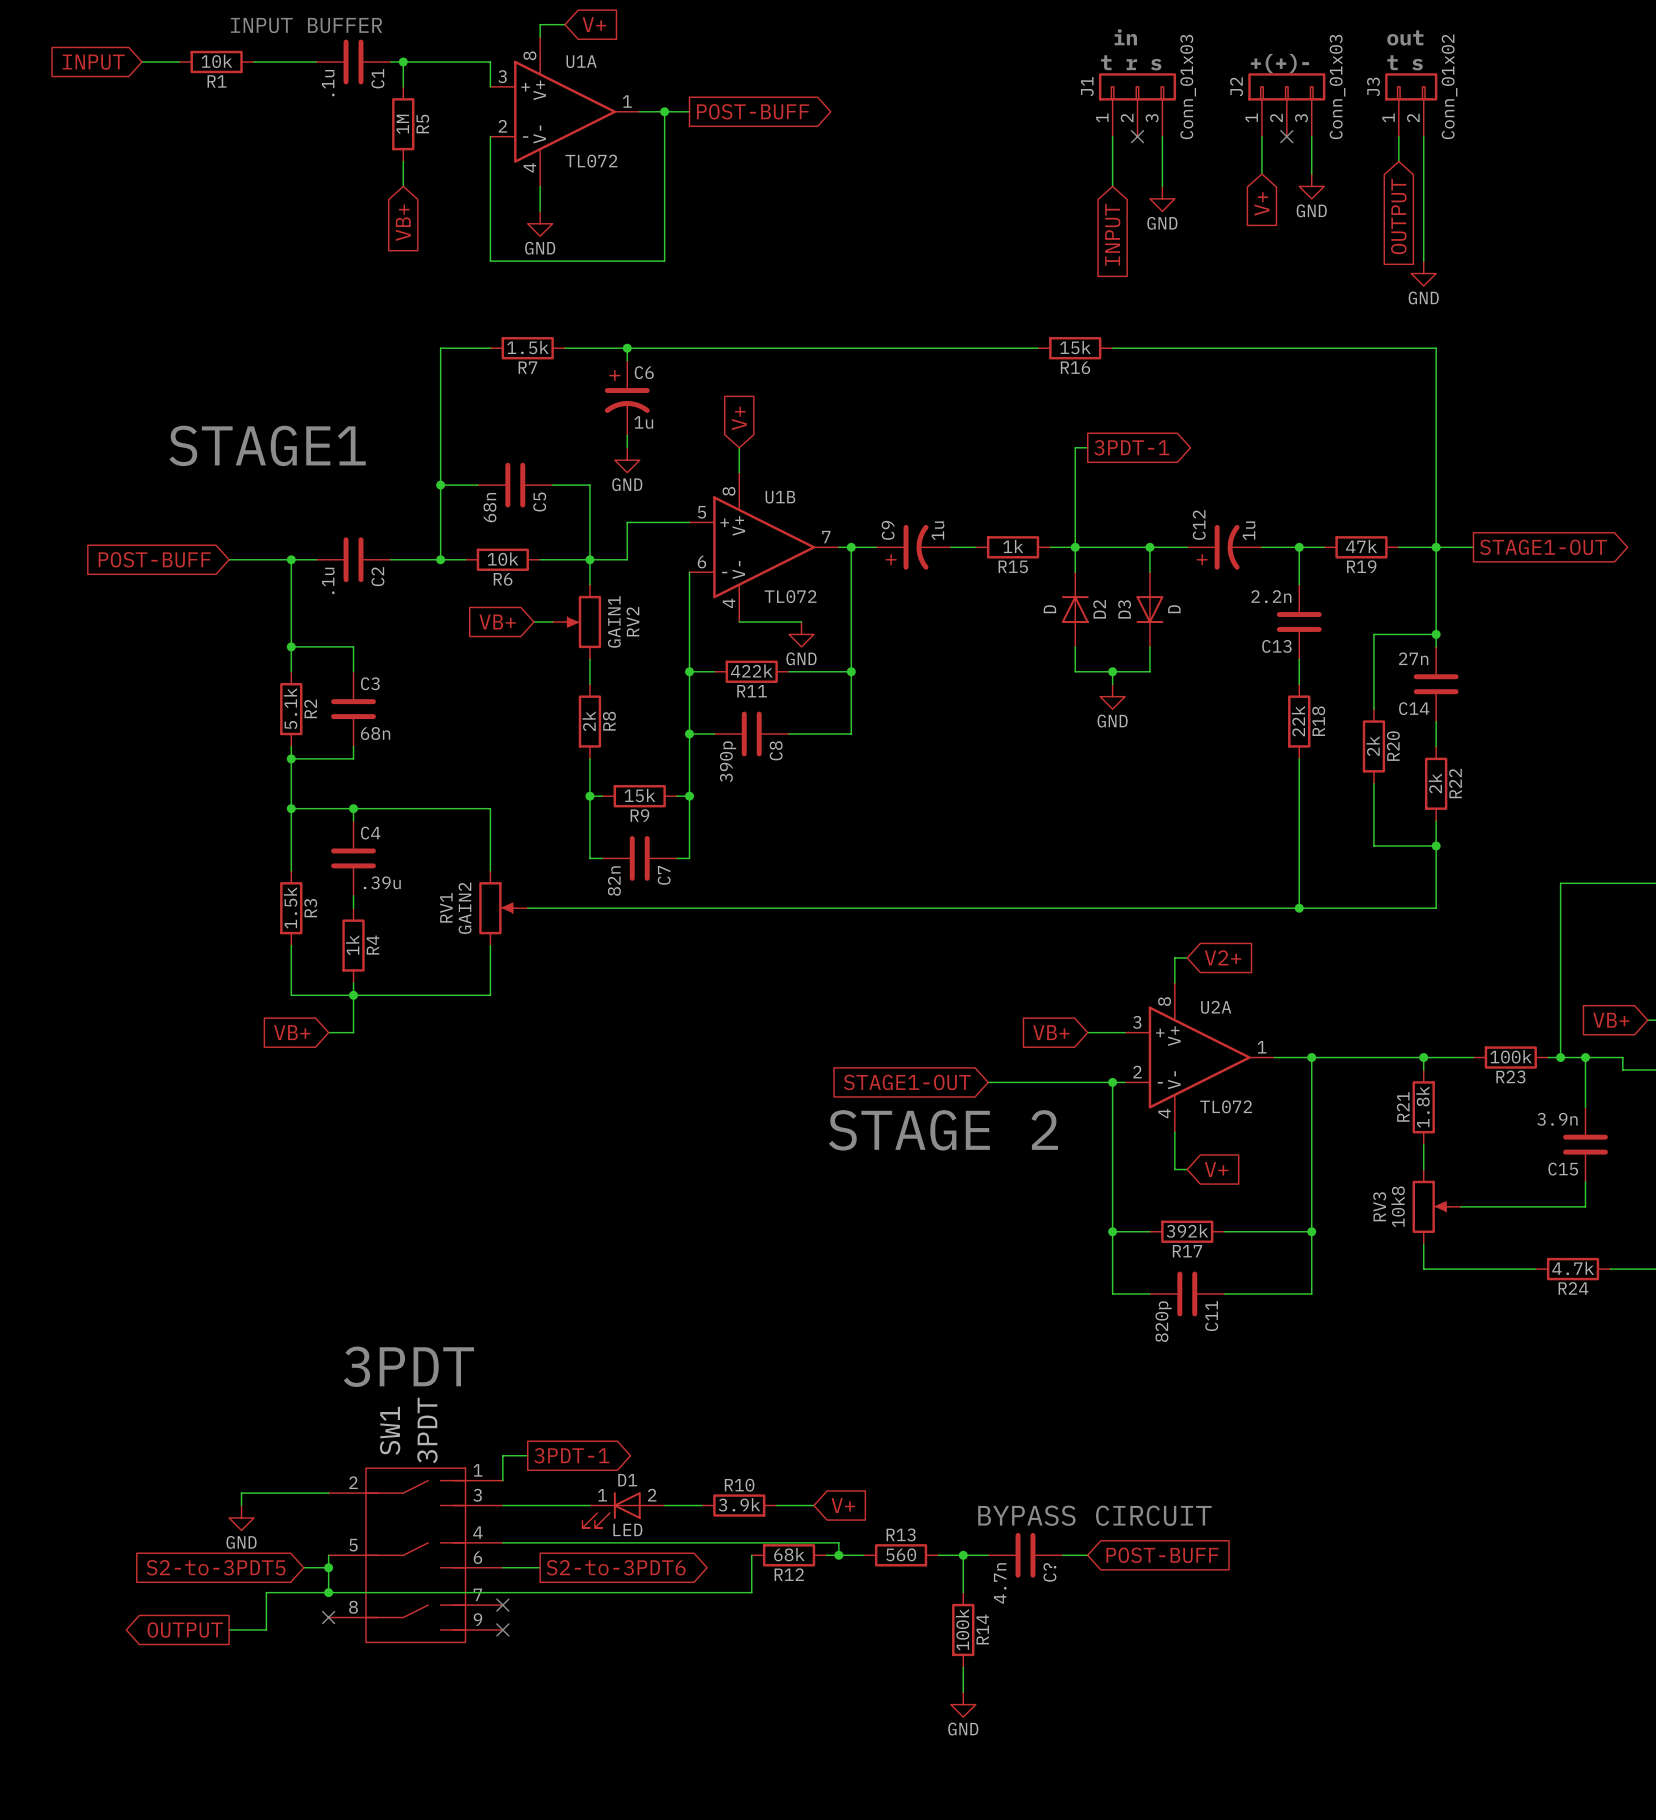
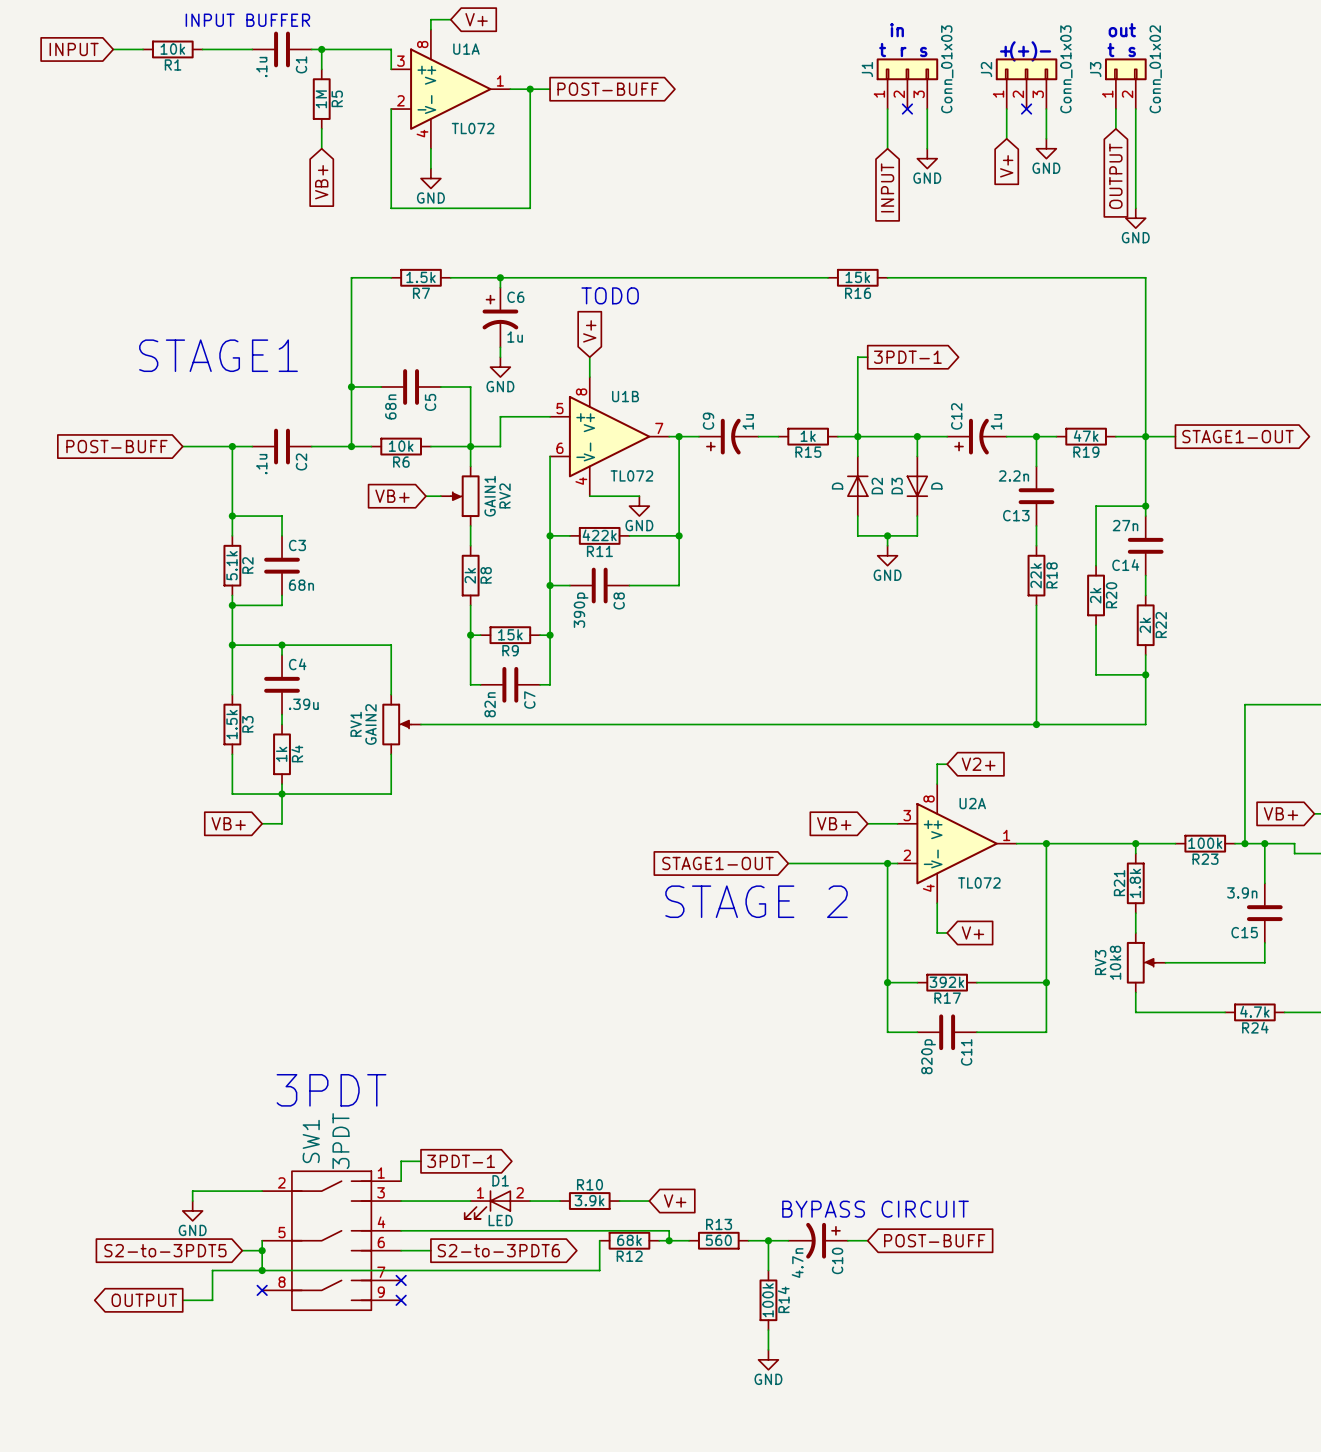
text: none -> TODO (610, 295)
C?: 4.7n (1025, 1555) -> none
C10: none -> 4.7n (818, 1240)

